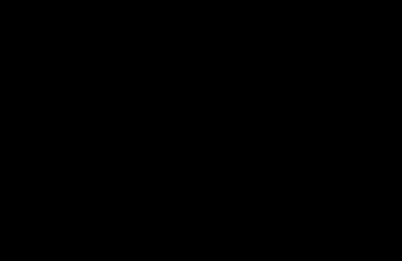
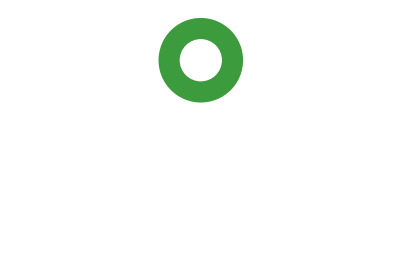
part: none -> (200, 60)

